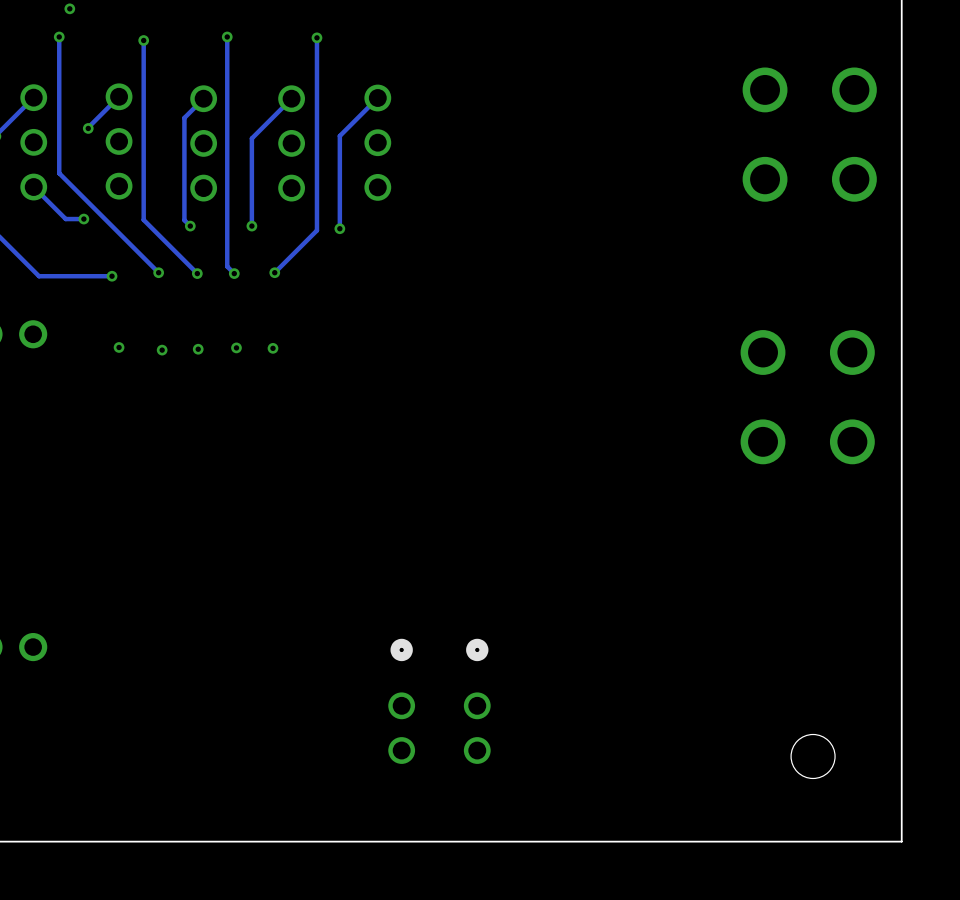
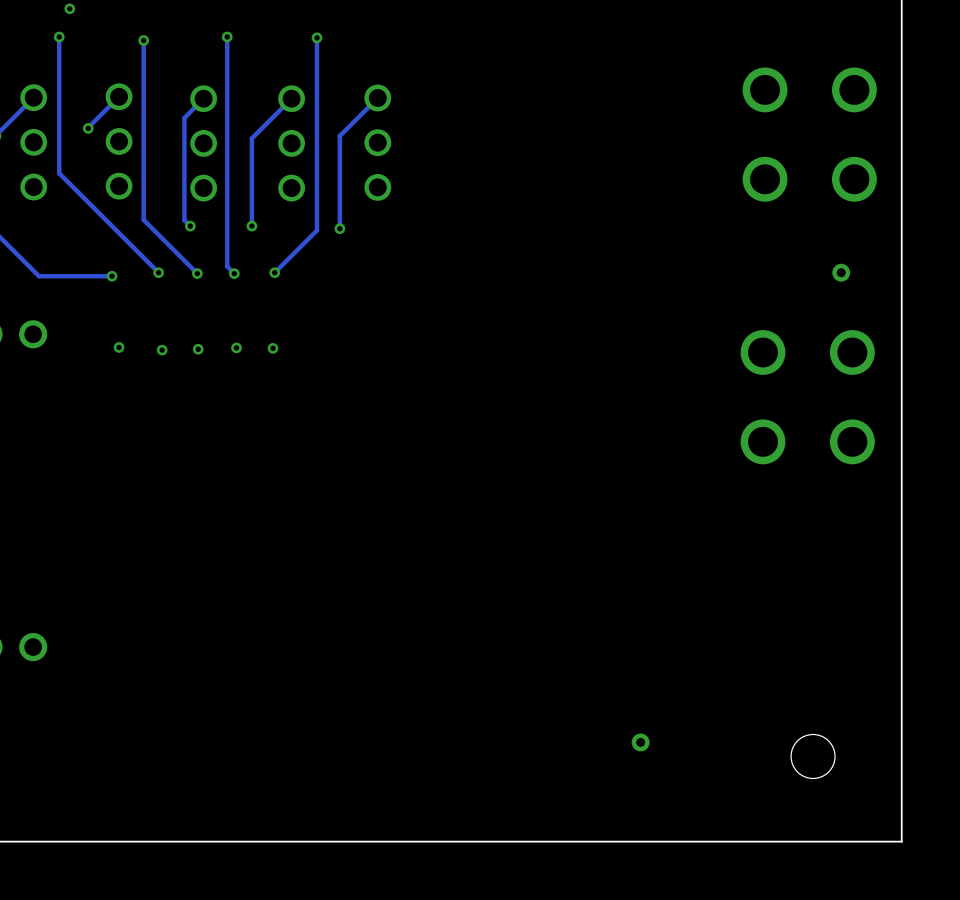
track: (33, 187) (65, 219) (83, 219) -> none
via: (83, 219) -> none
via: none -> (841, 272)
part: (401, 701) -> none
part: (477, 701) -> none
via: none -> (640, 742)

